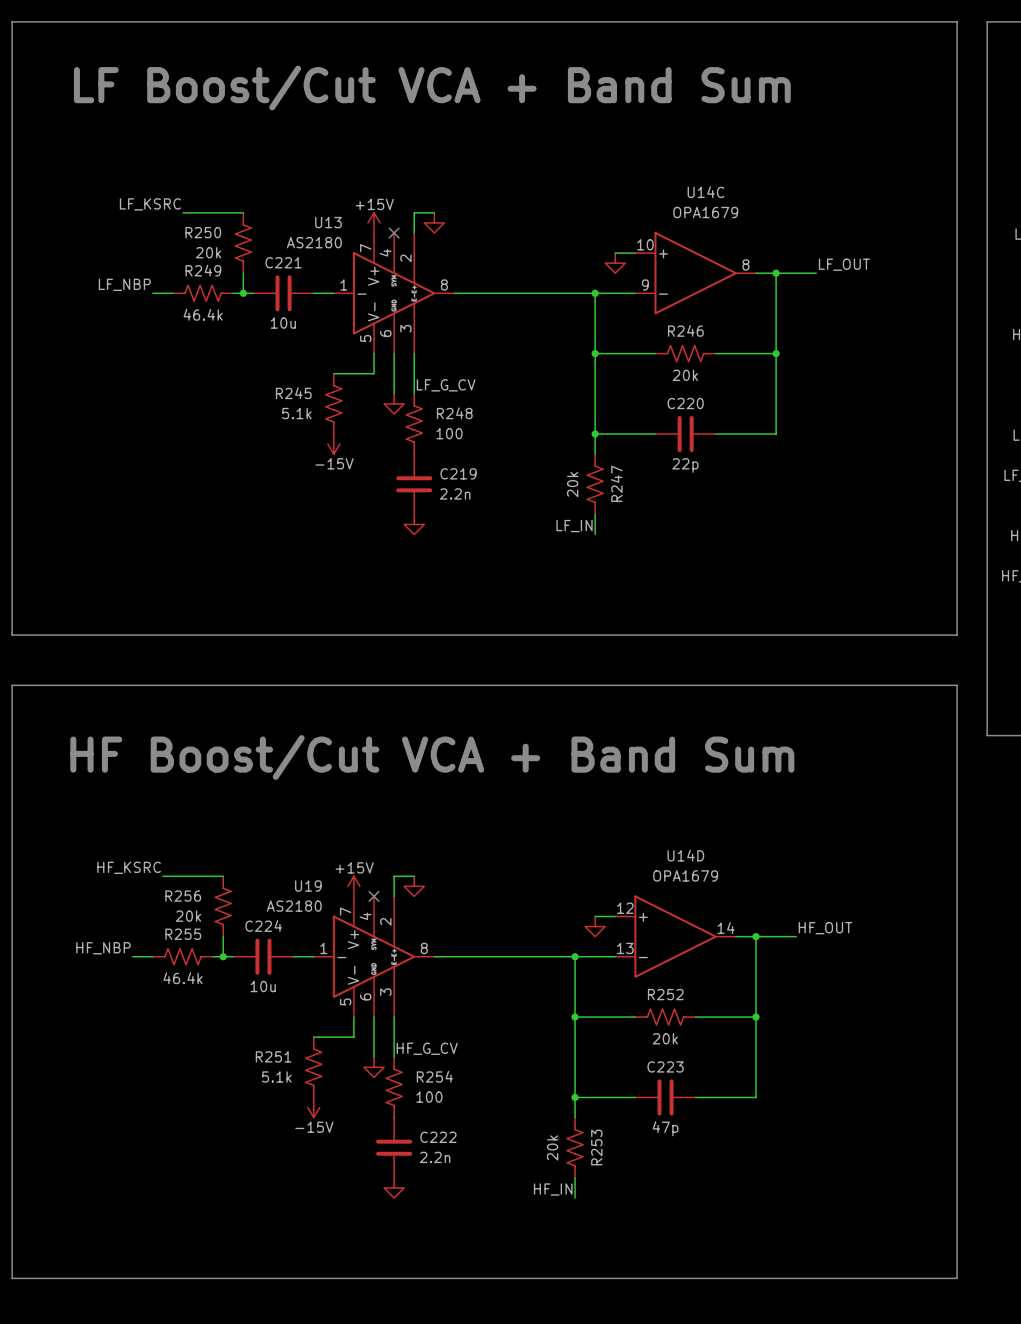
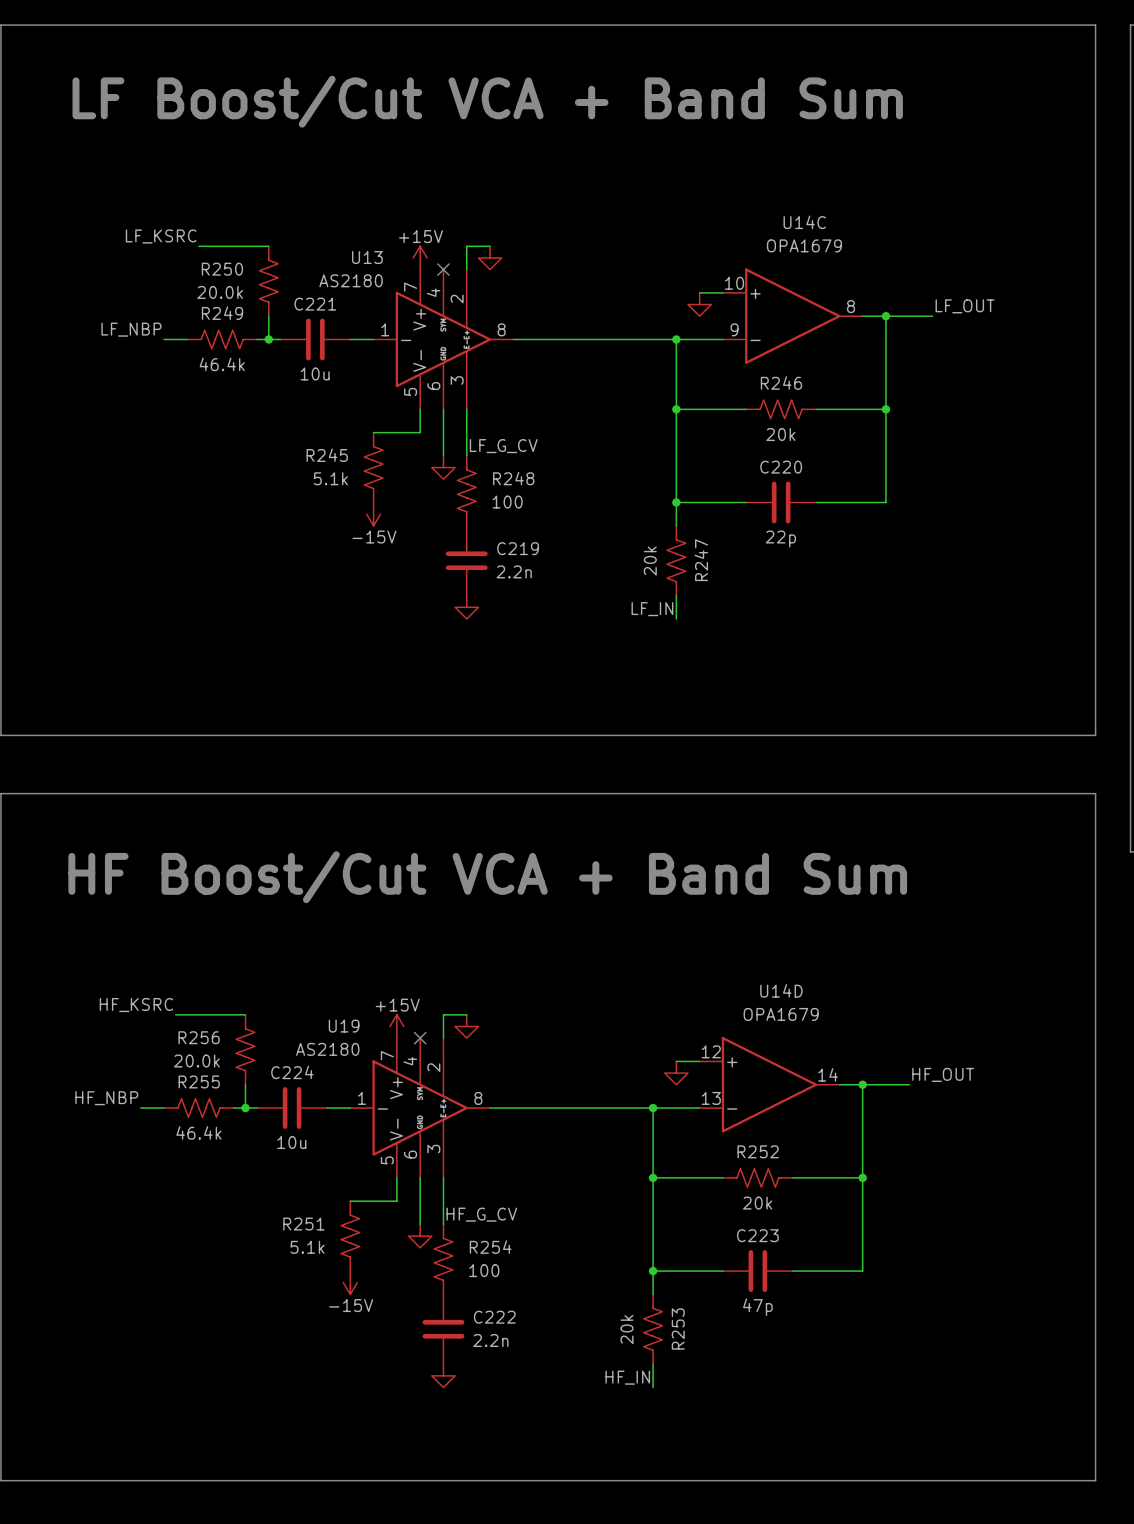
R250 value: 20k (208, 252) -> 20.0k (220, 292)
R256 value: 20k (188, 916) -> 20.0k (196, 1061)

